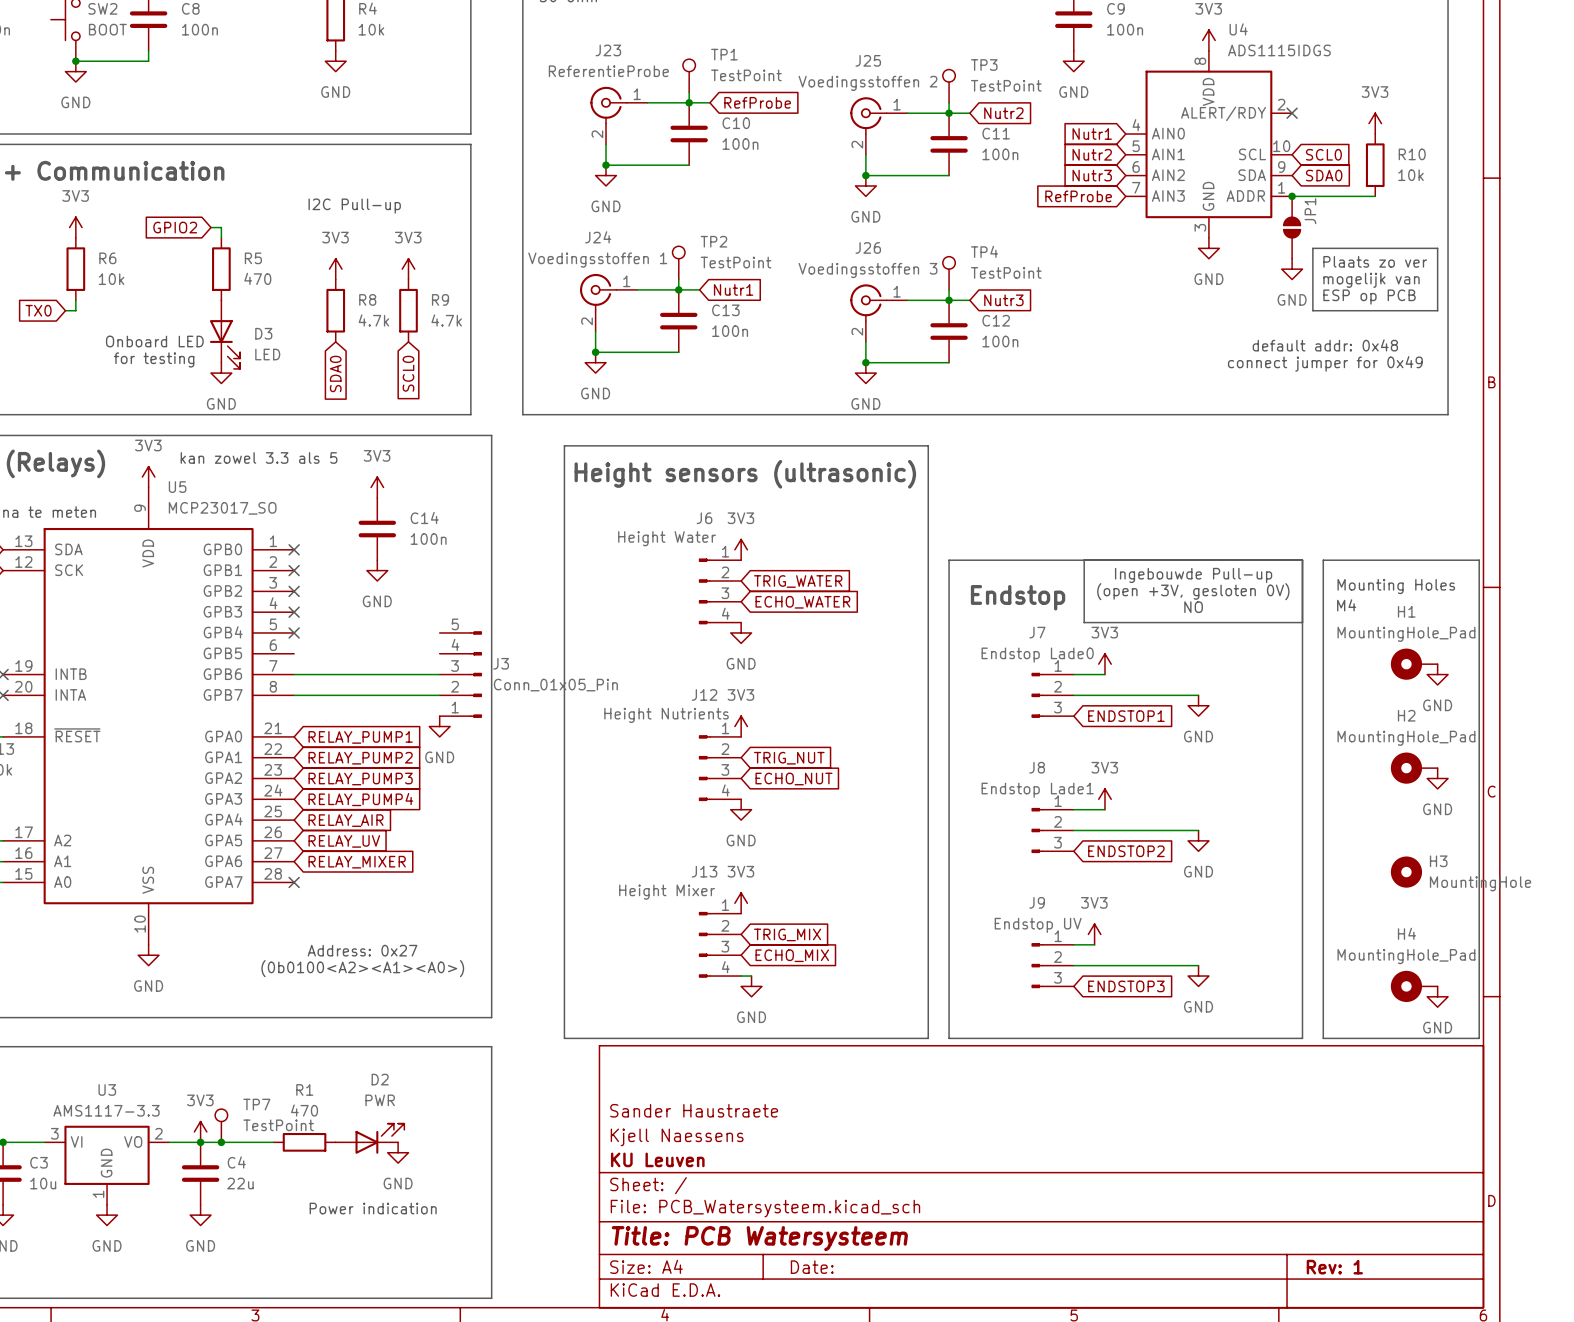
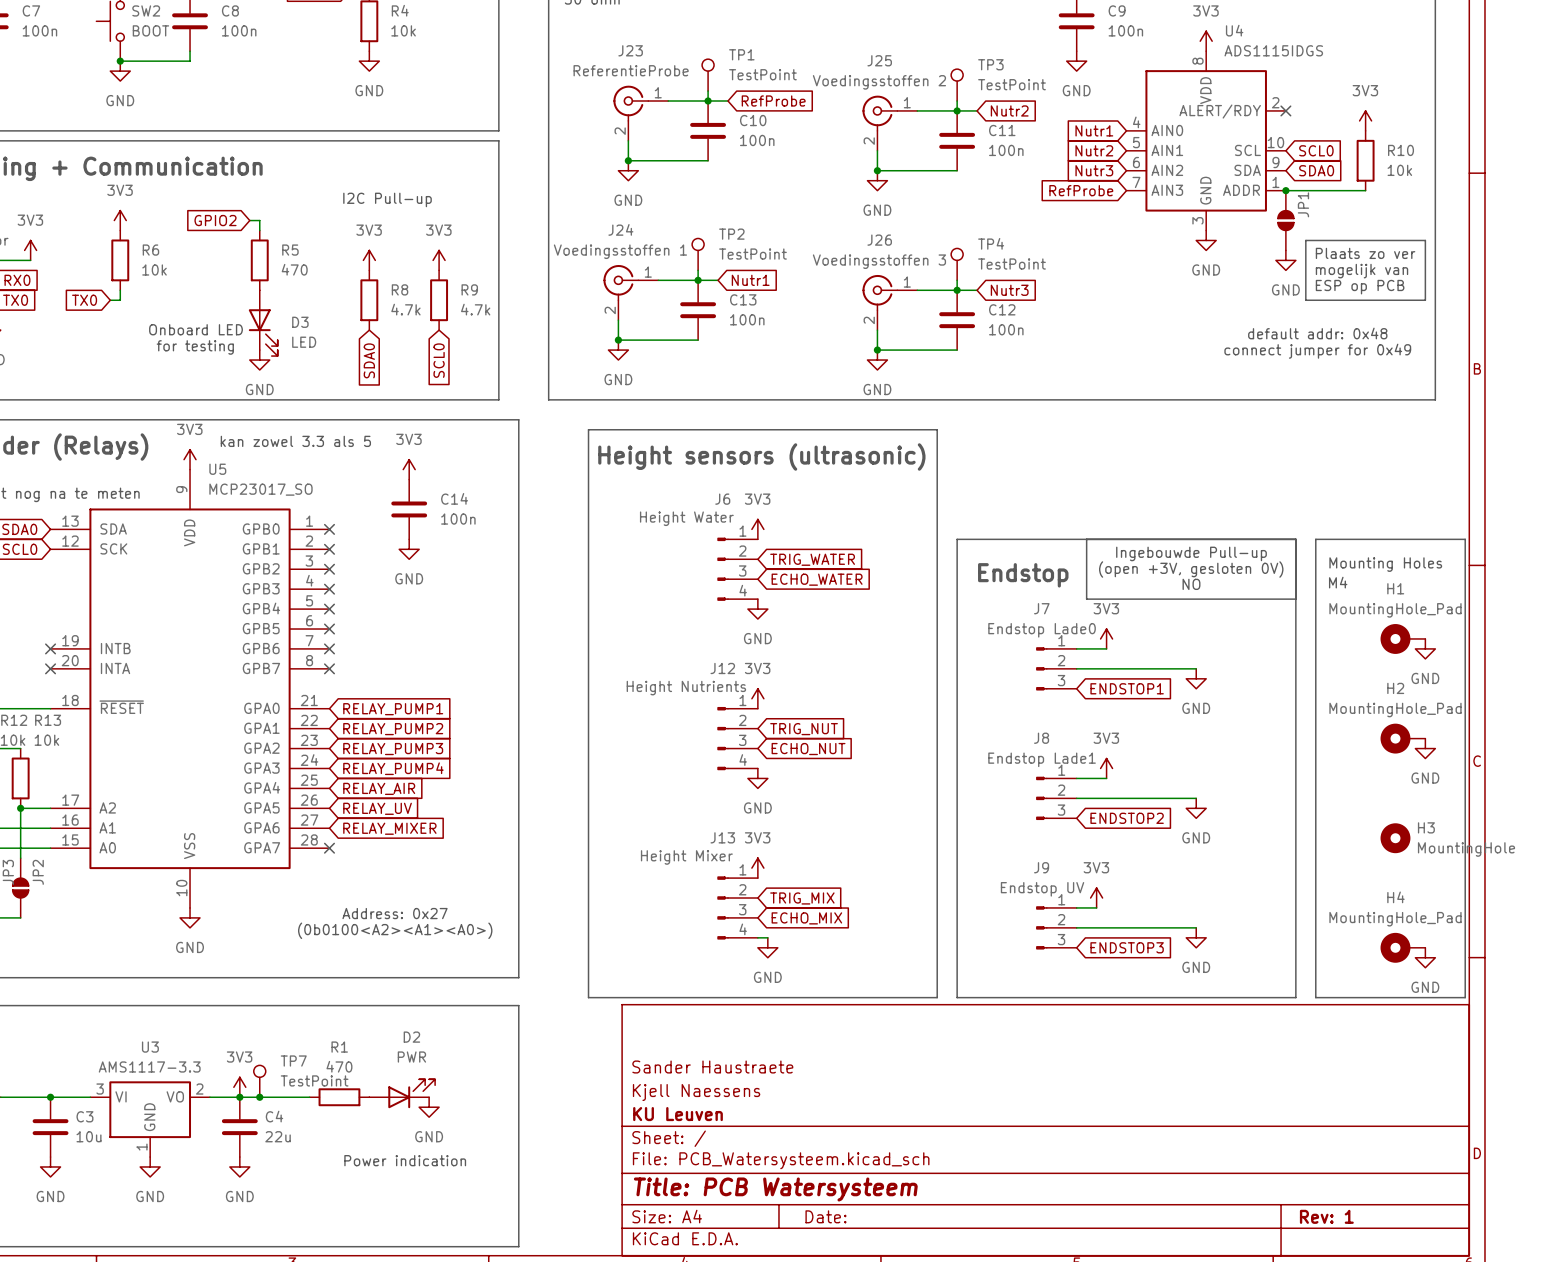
no-connect mark: none -> (329, 629)
wire: (294, 674) (439, 674) -> none
no-connect mark: none -> (329, 648)
J3: Conn_01x05_Pin (460, 674) -> none
wire: (294, 695) (439, 695) -> none
no-connect mark: none -> (329, 668)
power symbol: GND (439, 726) -> none

